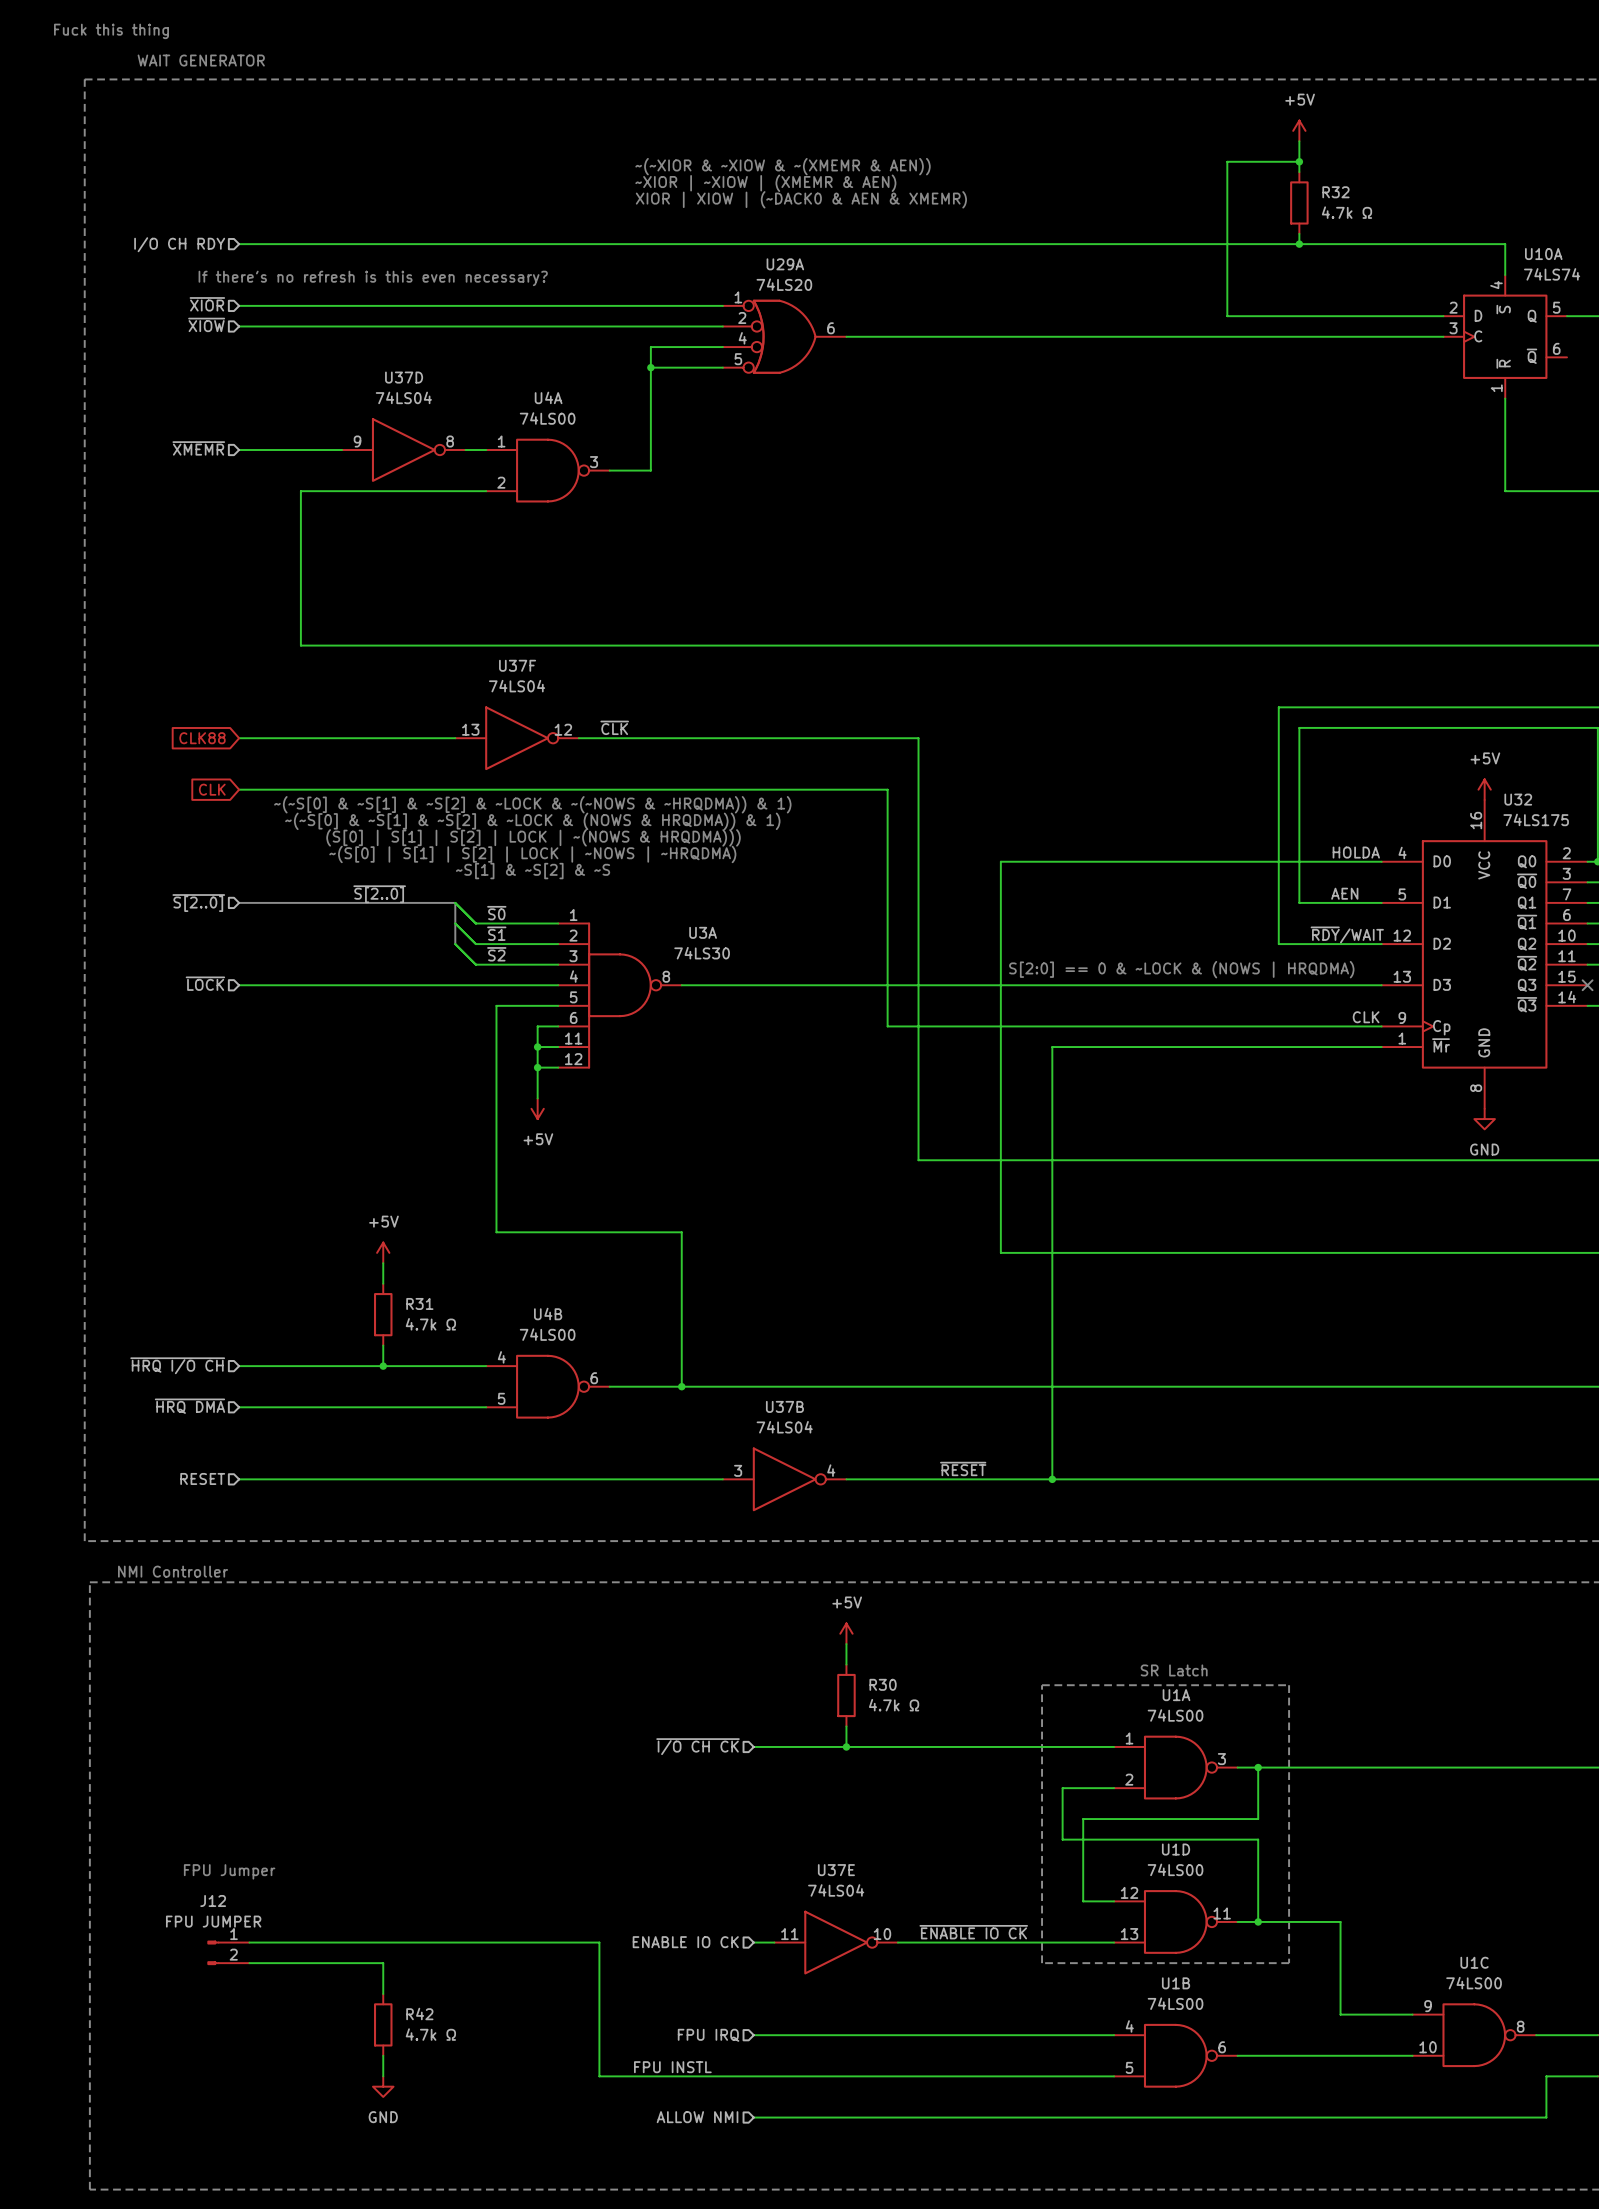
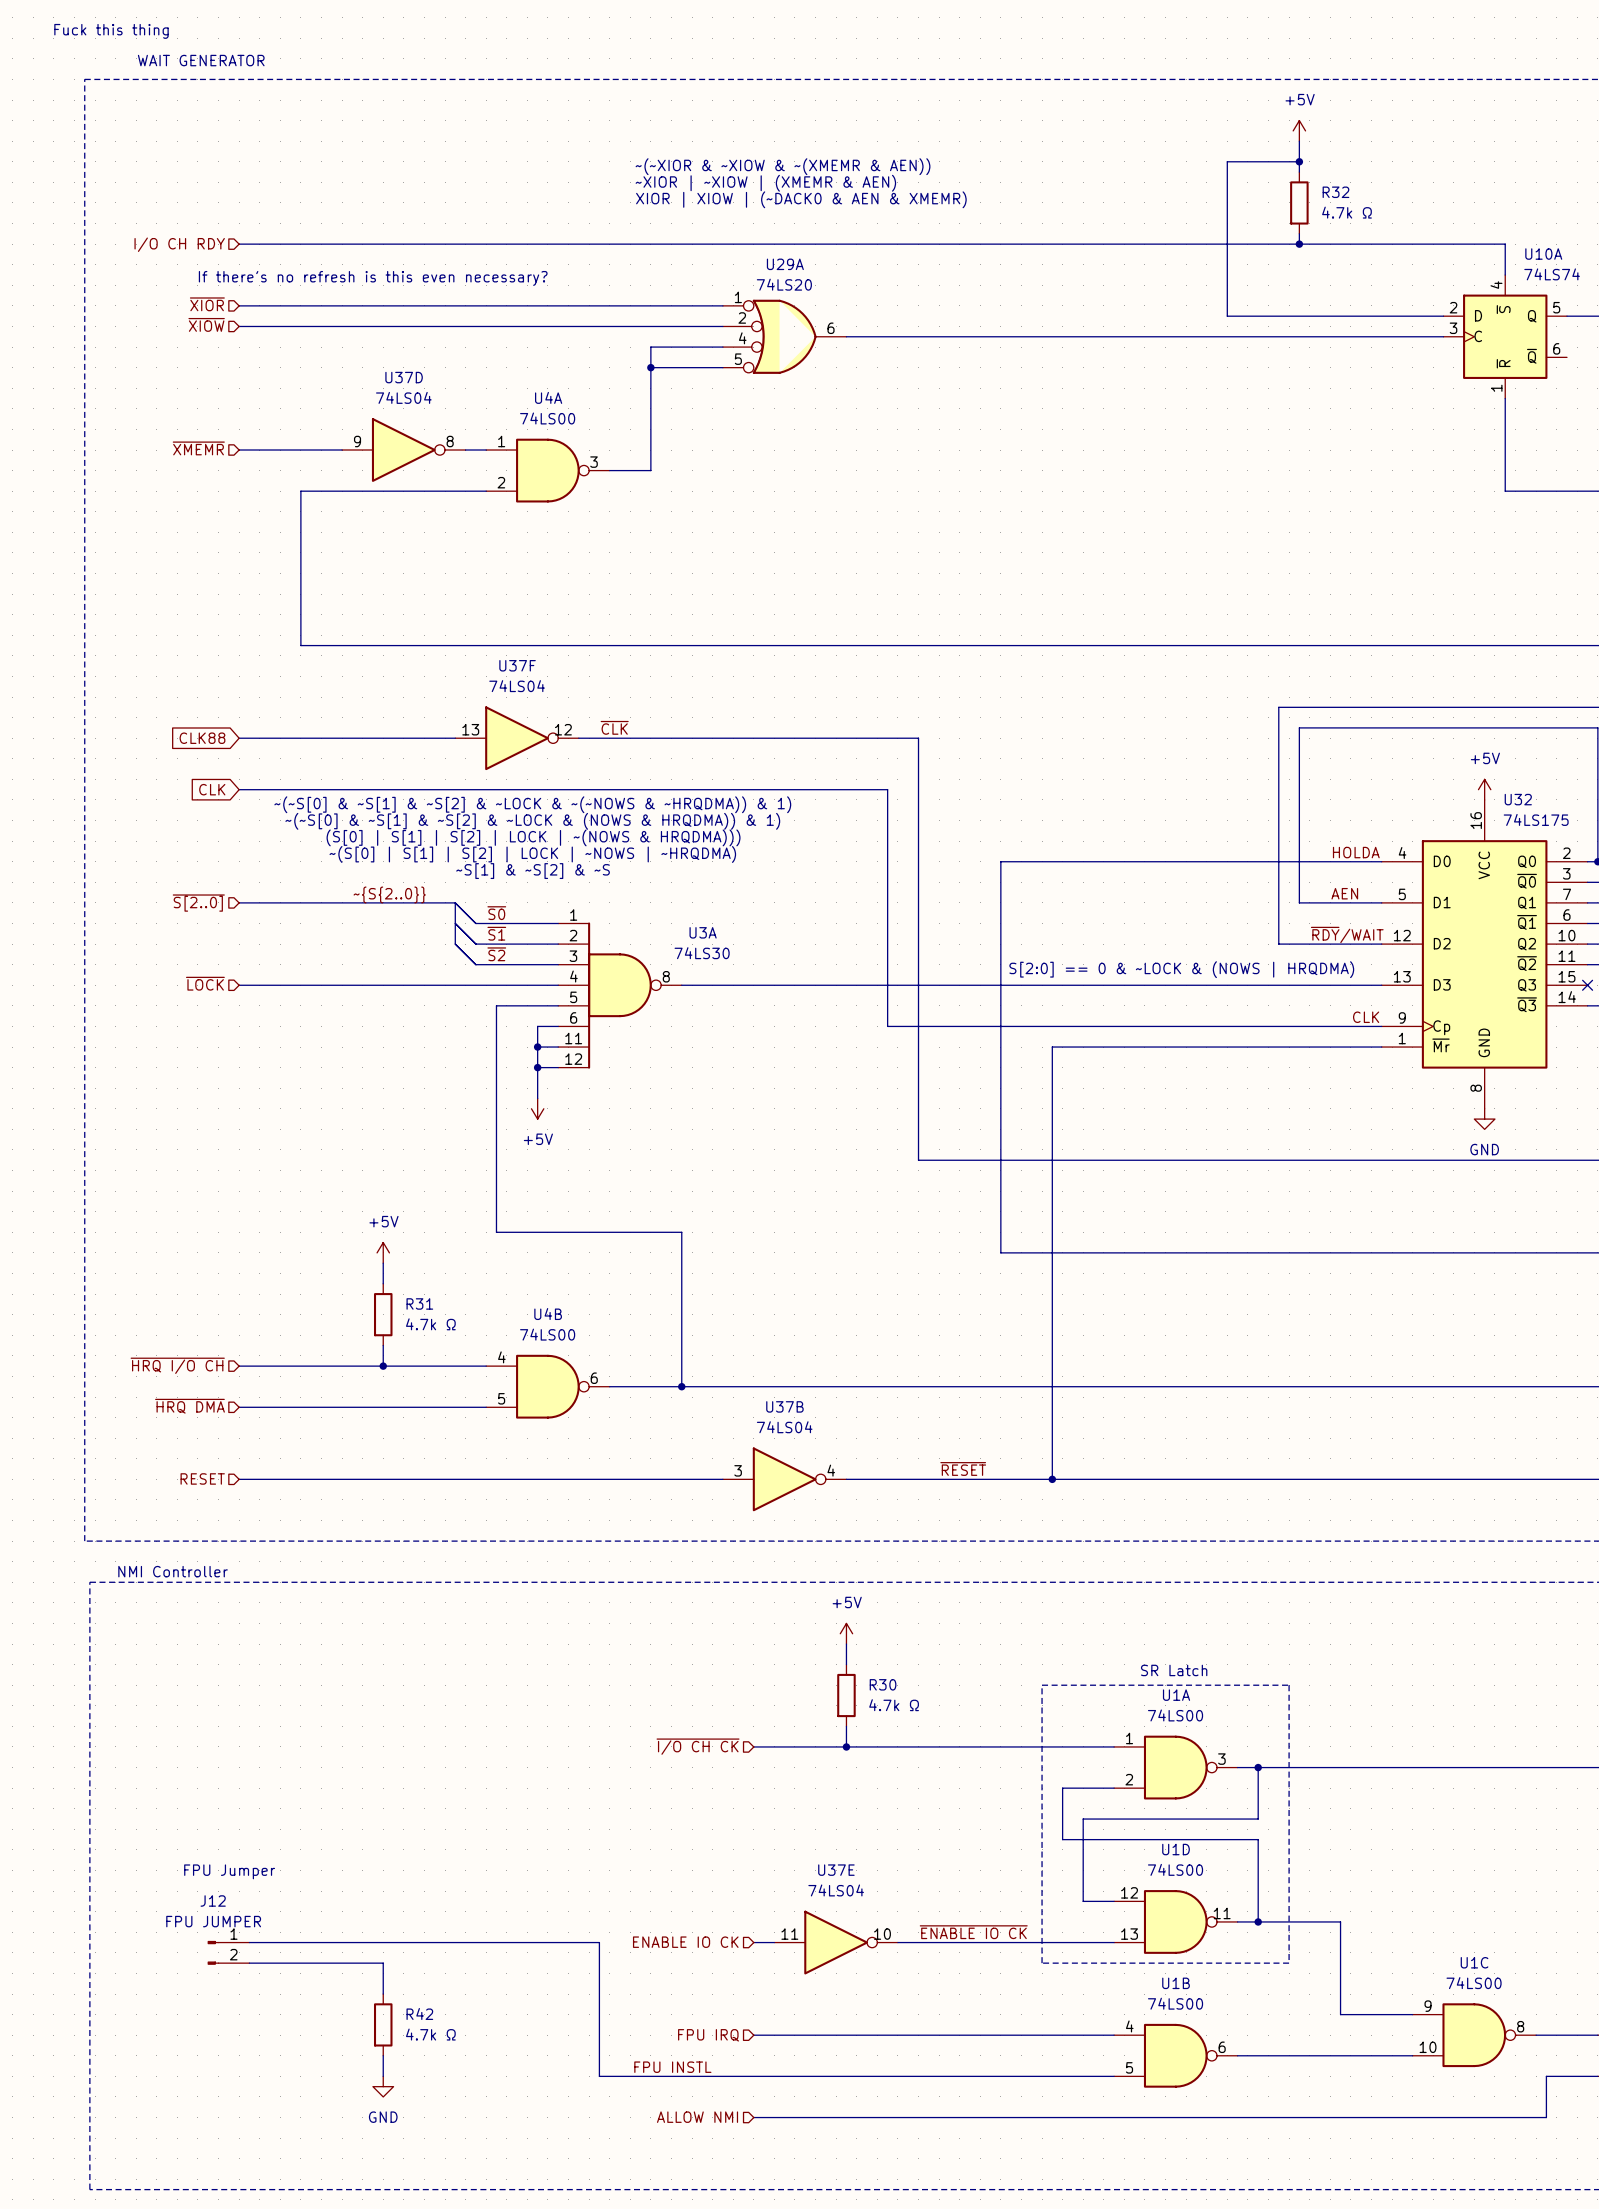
label: ~{S[2..0]} (379, 894) -> ~{S{2..0}} (389, 894)

